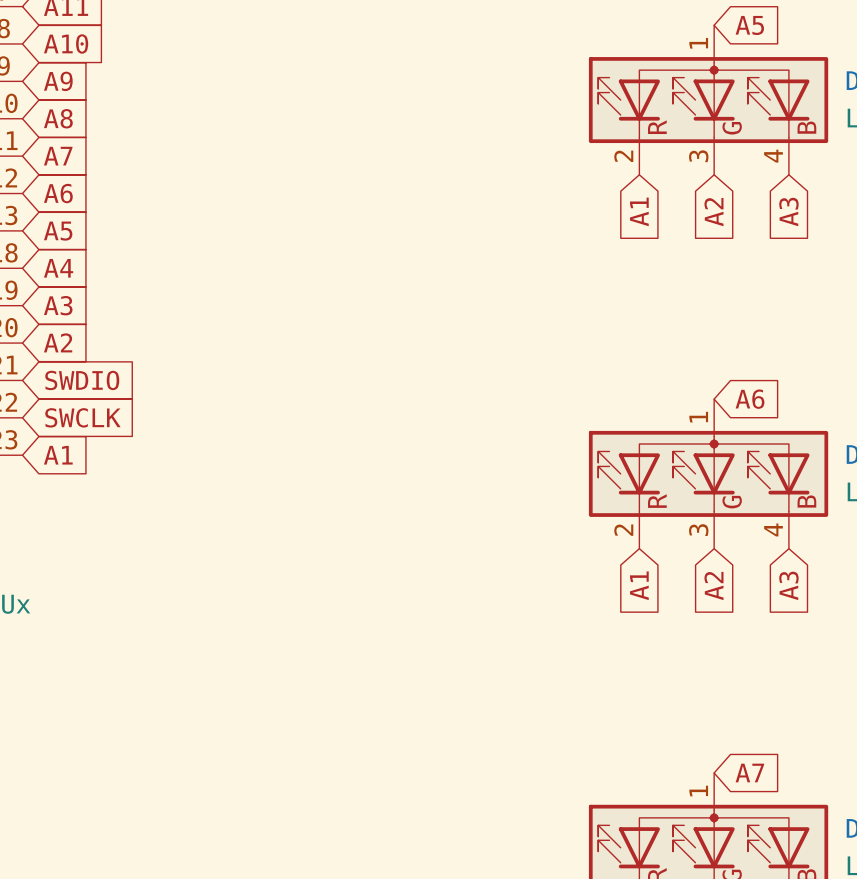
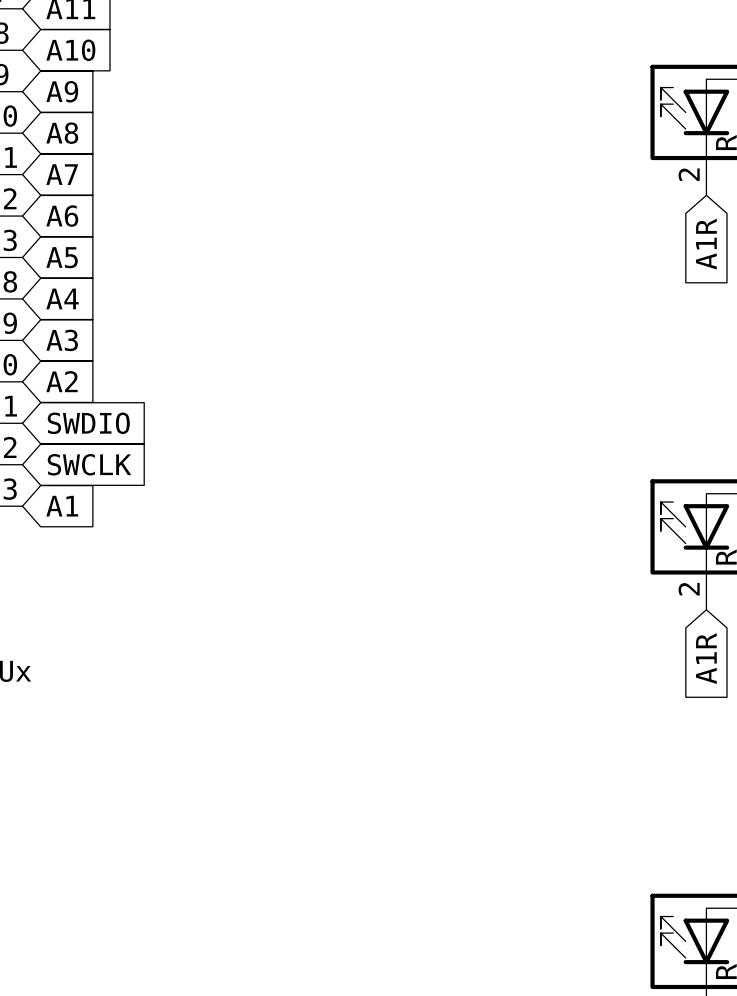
global label: A1 (639, 211) -> A1R (706, 244)
global label: A1 (639, 585) -> A1R (706, 658)

